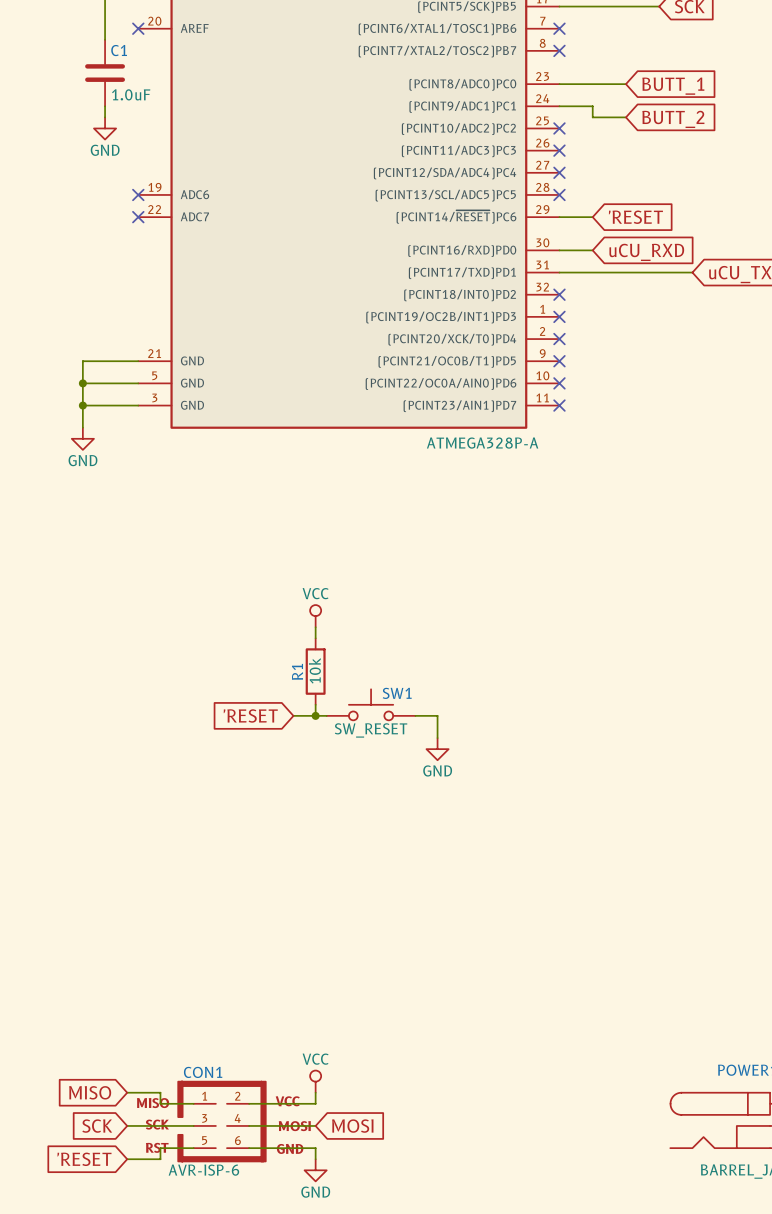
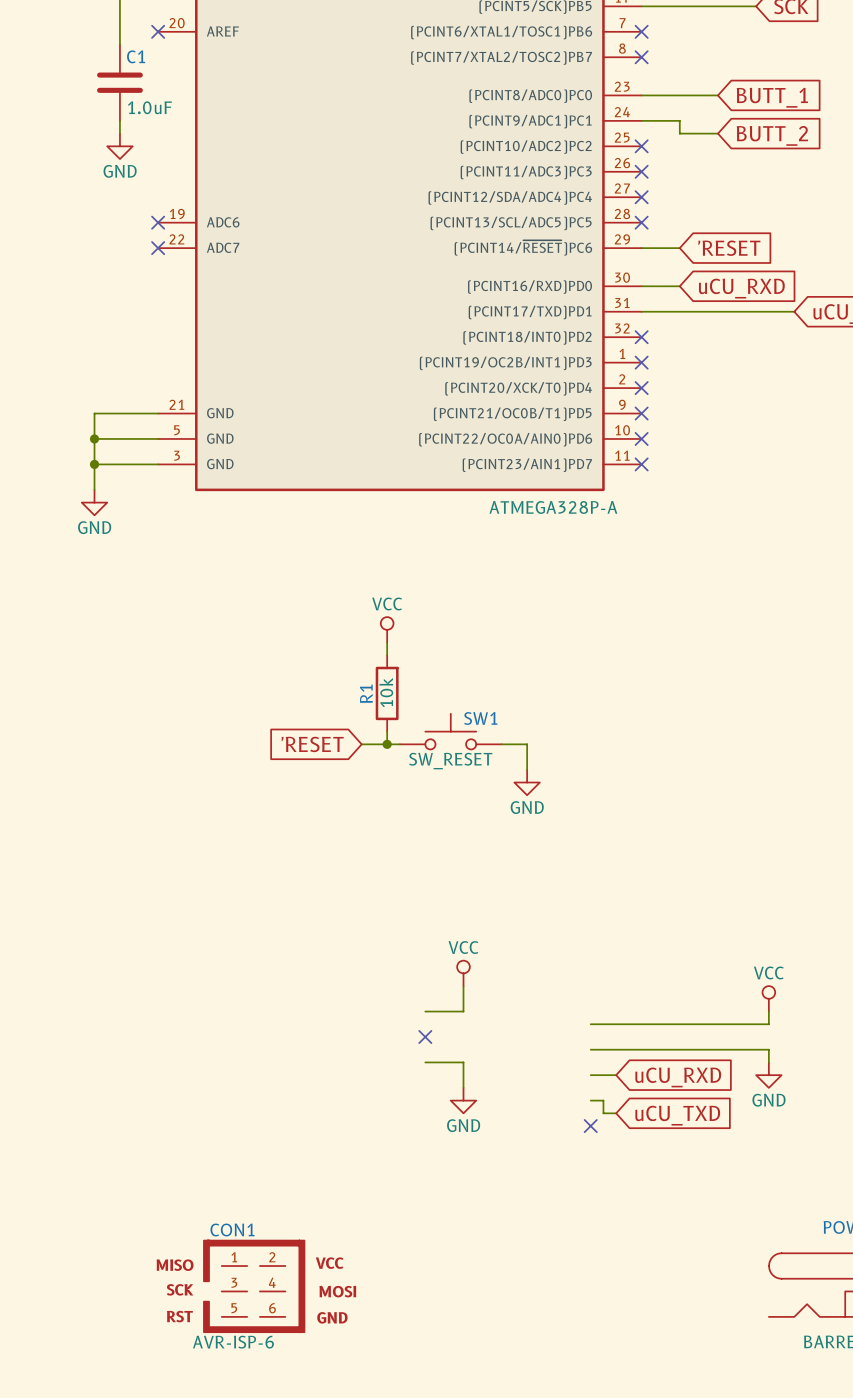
power symbol position: VCC (315, 616) -> VCC (387, 629)
wire: (315, 627) (315, 638) -> (387, 642) (387, 655)
junction: none -> (387, 744)
R1 position: (315, 671) -> (387, 693)
wire: (315, 704) (315, 715) -> (387, 731) (387, 744)
SW1 position: (371, 704) -> (450, 731)
global label position: 'RESET (250, 715) -> 'RESET (312, 744)
wire: (293, 715) (326, 715) -> (361, 744) (399, 744)
junction: (315, 715) -> none
wire: (415, 715) (437, 715) (437, 738) -> (501, 744) (527, 744) (527, 769)
power symbol position: GND (437, 749) -> GND (527, 782)
power symbol: none -> VCC (463, 973)
wire: none -> (463, 986) (463, 1011) (425, 1011)
power symbol: none -> VCC (768, 998)
wire: none -> (768, 1011) (768, 1024) (590, 1024)
no-connect mark: none -> (425, 1036)
wire: none -> (590, 1049) (768, 1049) (768, 1062)
wire: none -> (425, 1062) (463, 1062) (463, 1087)
wire: none -> (590, 1075) (616, 1075)
power symbol: none -> GND (768, 1075)
global label: none -> uCU_RXD (678, 1077)
power symbol: none -> GND (463, 1100)
wire: none -> (590, 1100) (603, 1100) (603, 1113) (616, 1113)
global label: none -> uCU_TXD (677, 1115)
no-connect mark: none -> (590, 1126)
power symbol: VCC (315, 1081) -> none
global label: MISO (90, 1092) -> none
wire: (127, 1092) (160, 1092) (160, 1103) (193, 1103) -> none
wire: (315, 1092) (315, 1103) (249, 1103) -> none
wire: (127, 1125) (193, 1125) -> none
wire: (249, 1125) (315, 1125) -> none
global label: SCK (97, 1126) -> none
global label: MOSI (352, 1126) -> none
wire: (193, 1148) (160, 1148) (160, 1159) (127, 1159) -> none
wire: (249, 1148) (315, 1148) (315, 1159) -> none
global label: 'RESET (84, 1159) -> none
power symbol: GND (315, 1170) -> none

